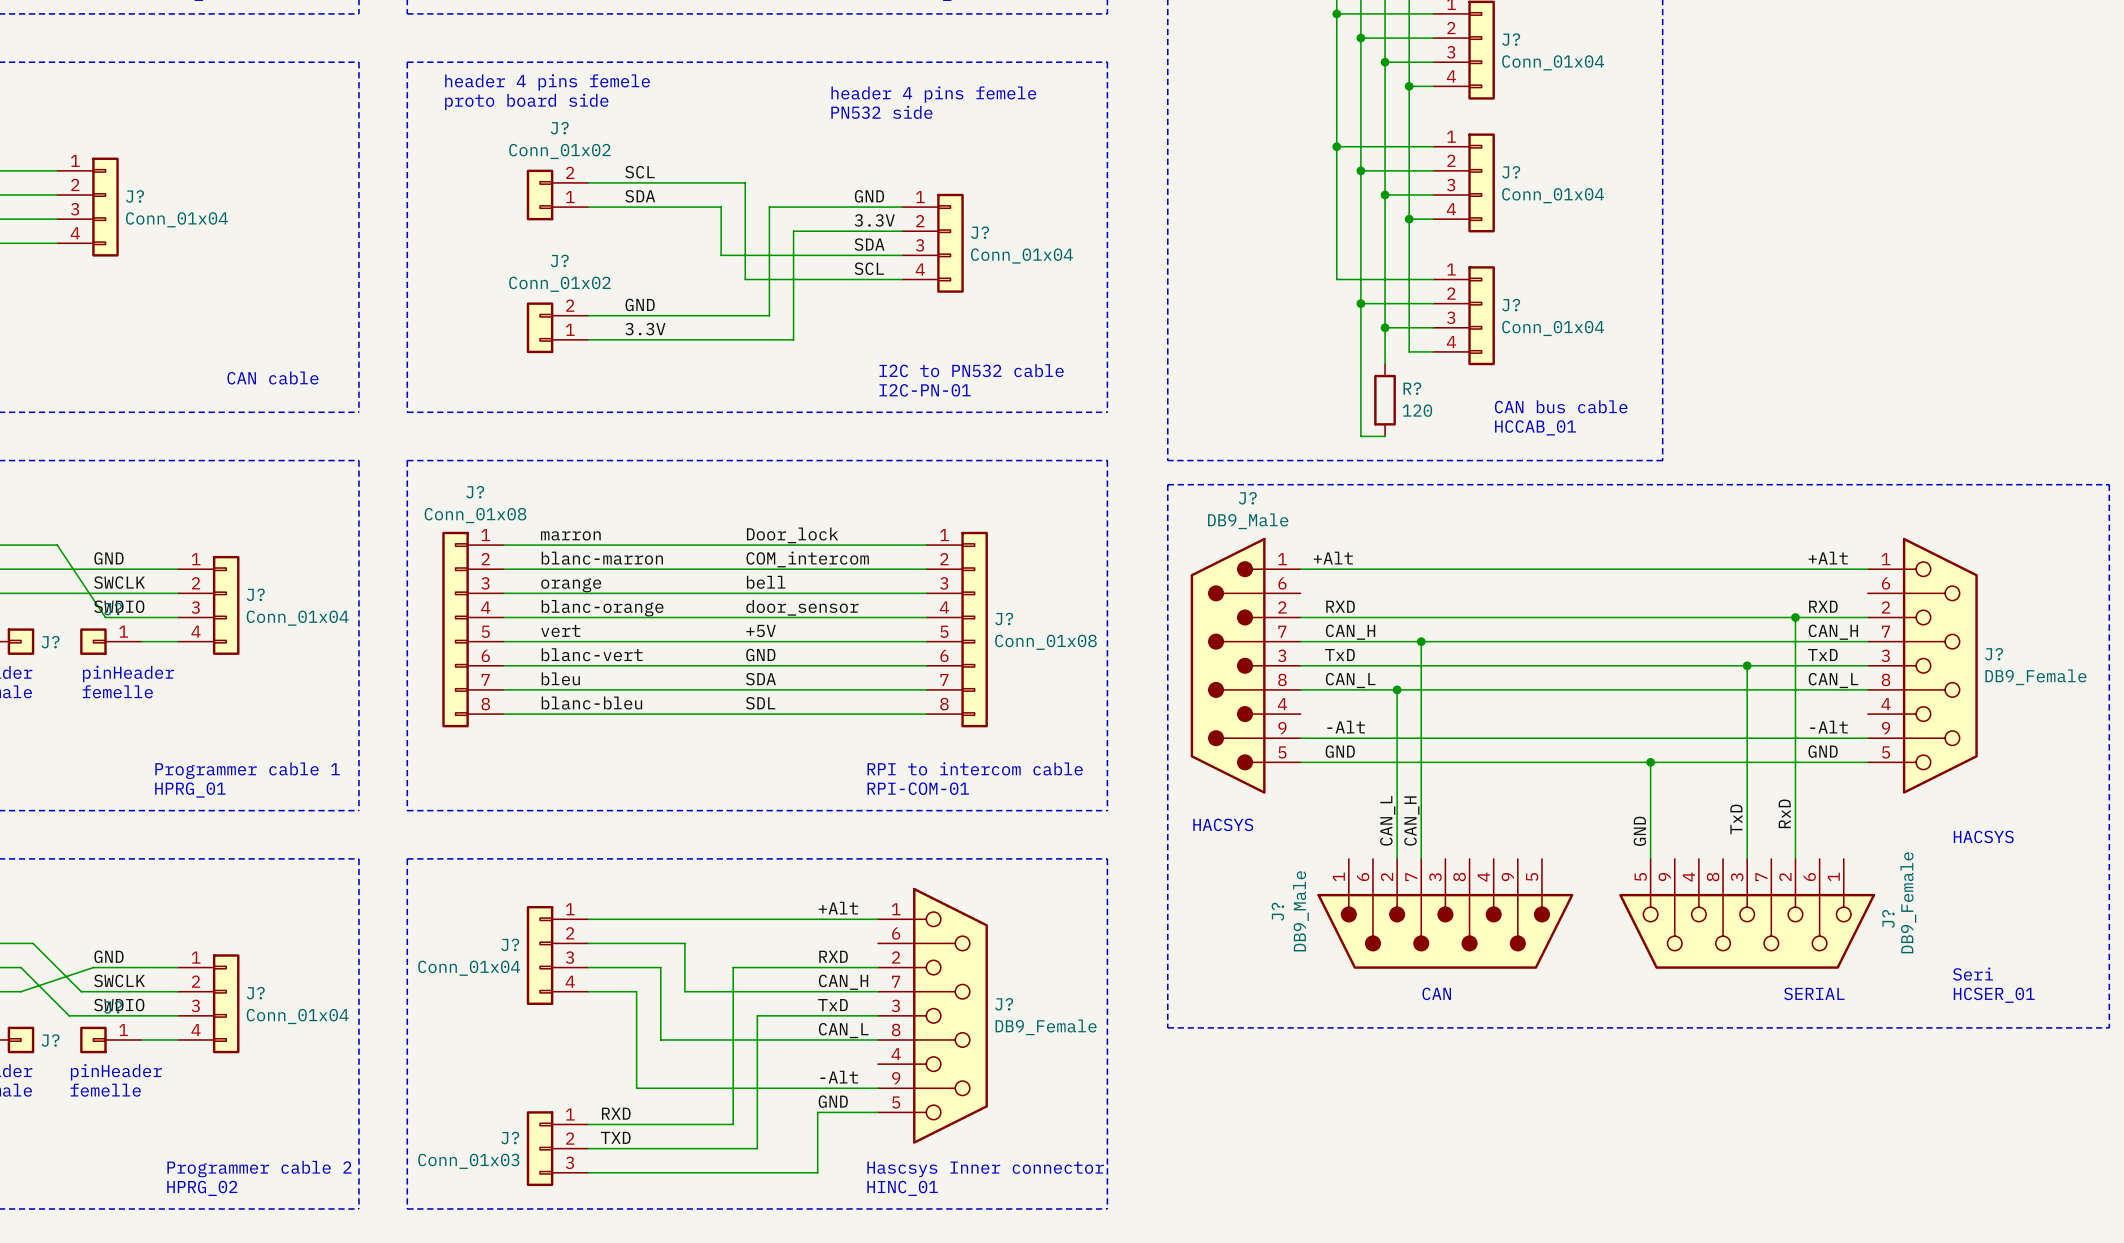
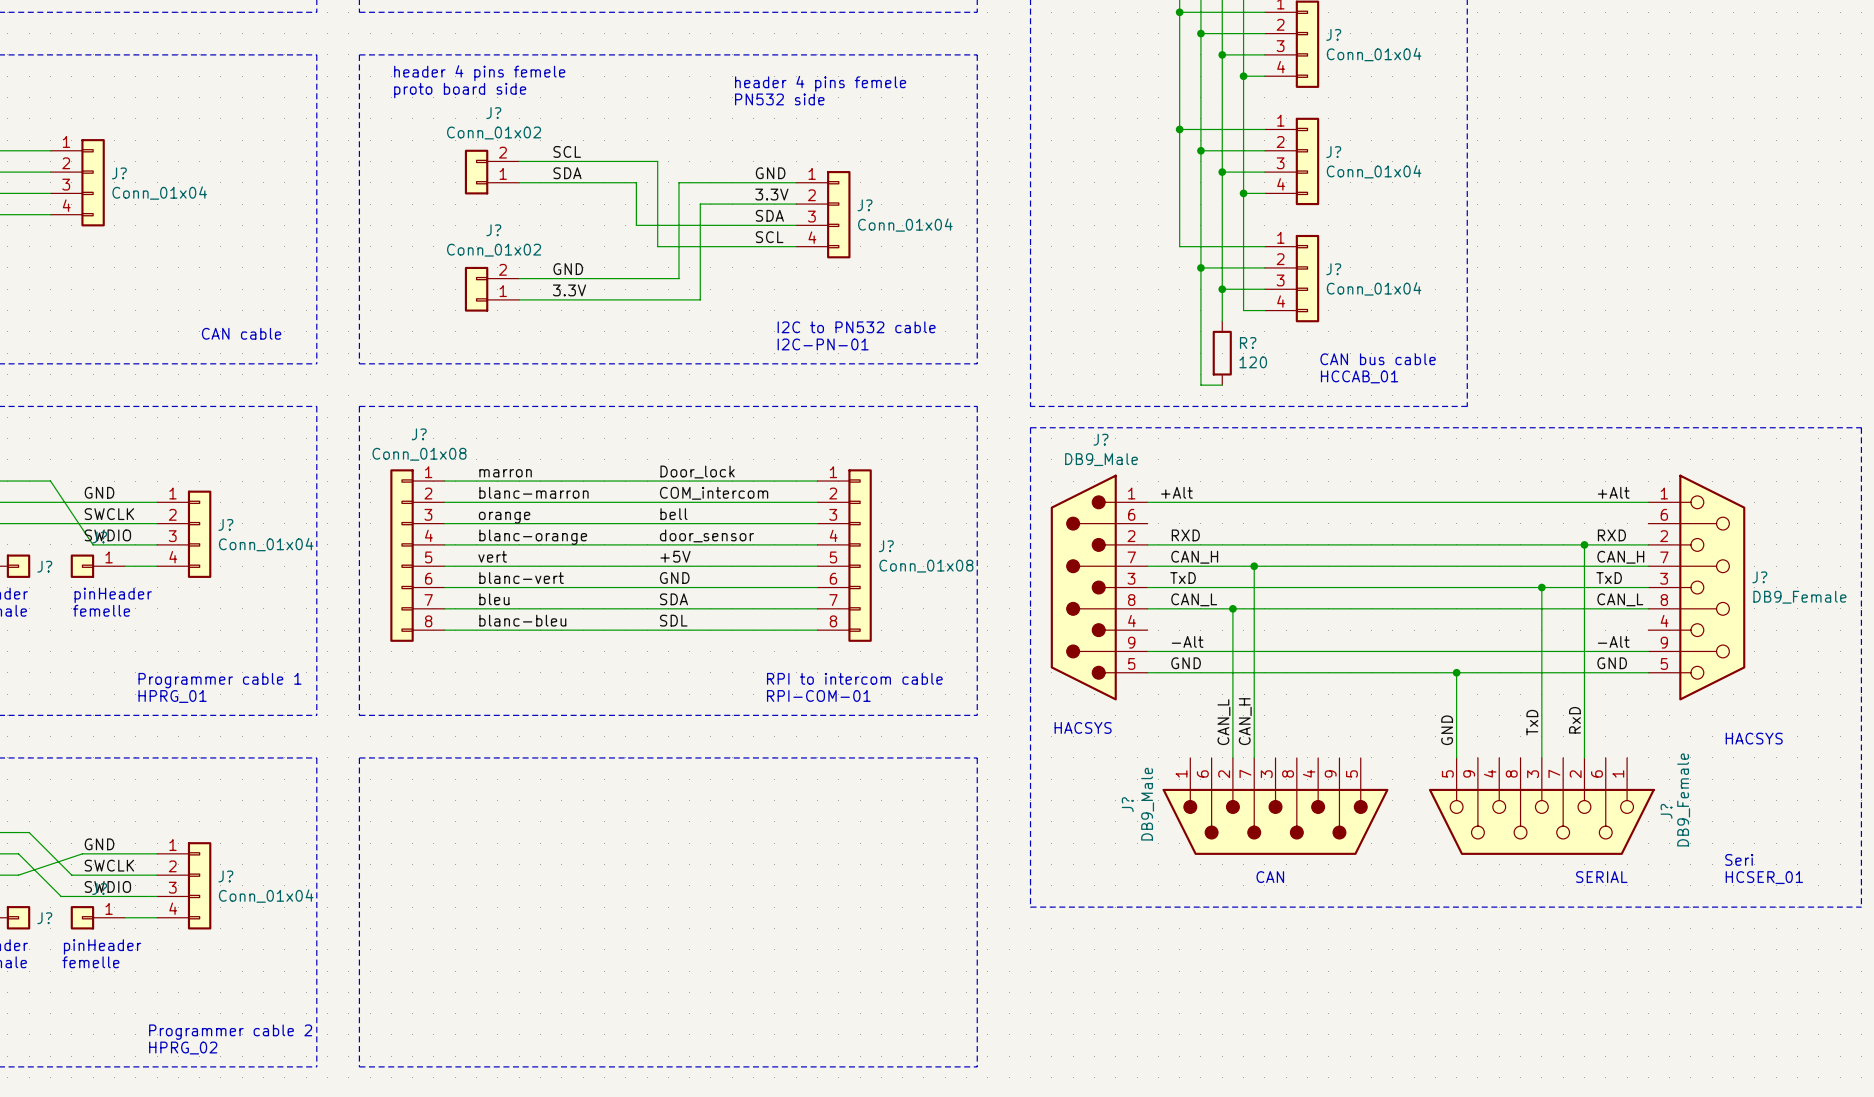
label: +Alt (838, 908) -> none
wire: (588, 919) (878, 919) -> none
wire: (588, 943) (684, 943) (684, 991) (878, 991) -> none
J?: Conn_01x04 (557, 955) -> none
label: RXD (833, 956) -> none
wire: (588, 967) (660, 967) (660, 1039) (878, 1039) -> none
wire: (878, 967) (733, 967) (733, 1124) (588, 1124) -> none
label: CAN_H (843, 982) -> none
wire: (588, 991) (636, 991) (636, 1088) (878, 1088) -> none
label: TxD (832, 1005) -> none
wire: (878, 1015) (757, 1015) (757, 1148) (588, 1148) -> none
J?: DB9_Female (932, 1015) -> none
label: CAN_L (843, 1030) -> none
label: -Alt (839, 1077) -> none
label: GND (833, 1101) -> none
wire: (878, 1112) (817, 1112) (817, 1172) (588, 1172) -> none
label: RXD (616, 1113) -> none
label: TXD (615, 1137) -> none
J?: Conn_01x03 (557, 1148) -> none
text: Hascsys Inner connector (985, 1169) -> none
text: HINC_01 (902, 1188) -> none

